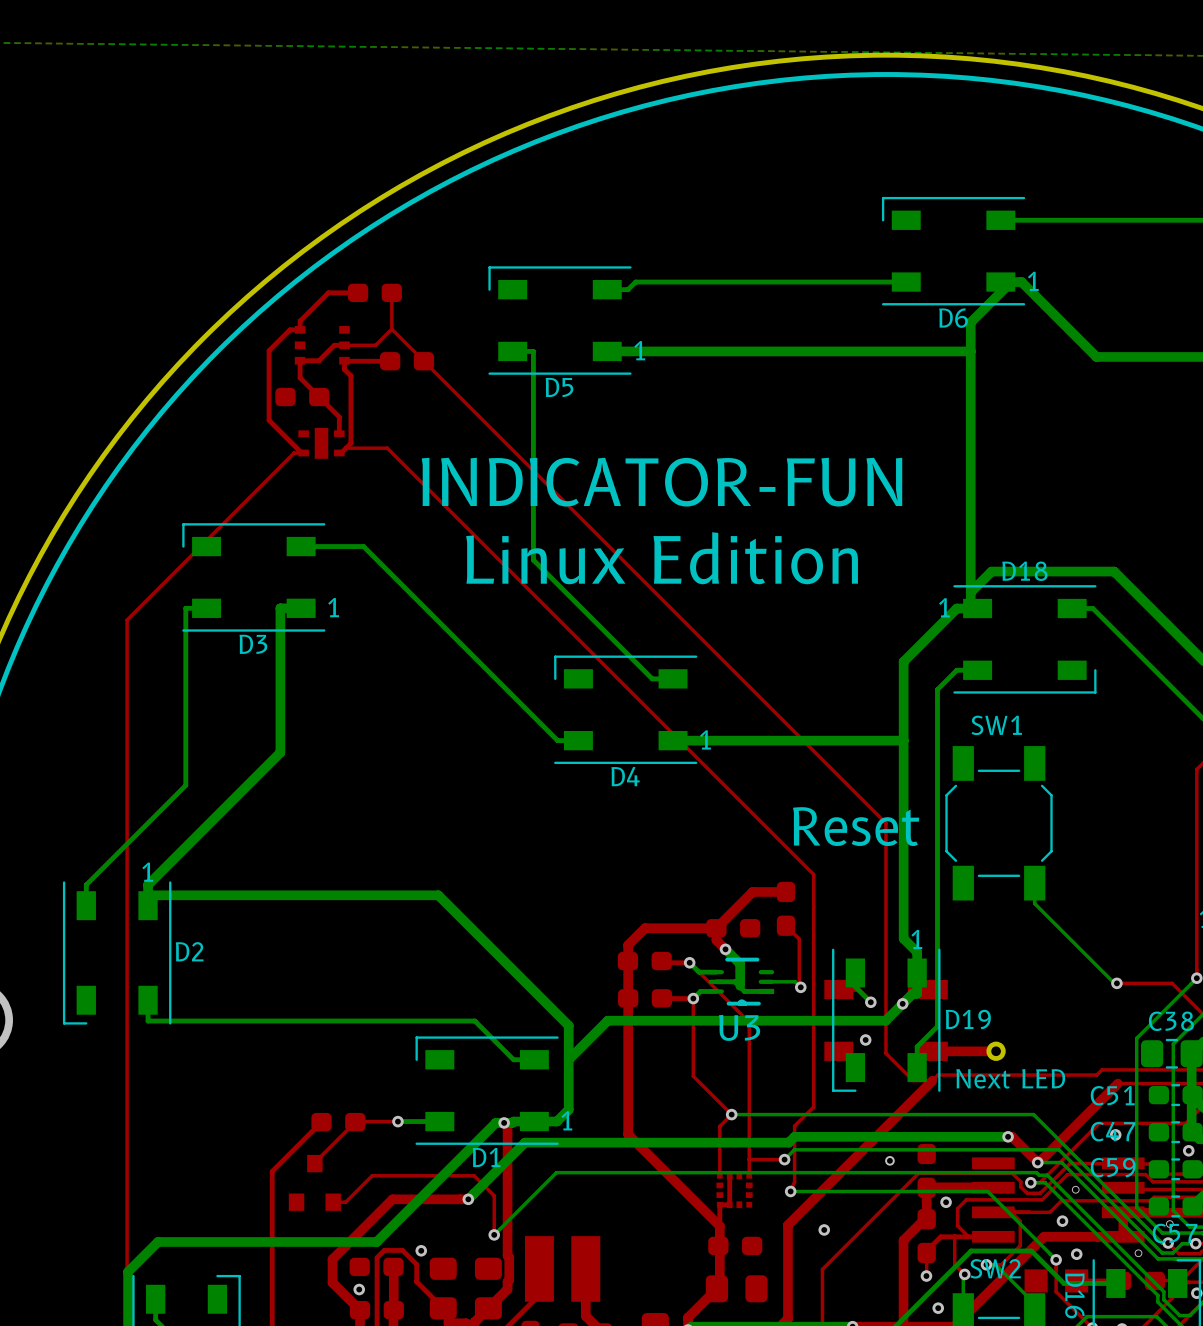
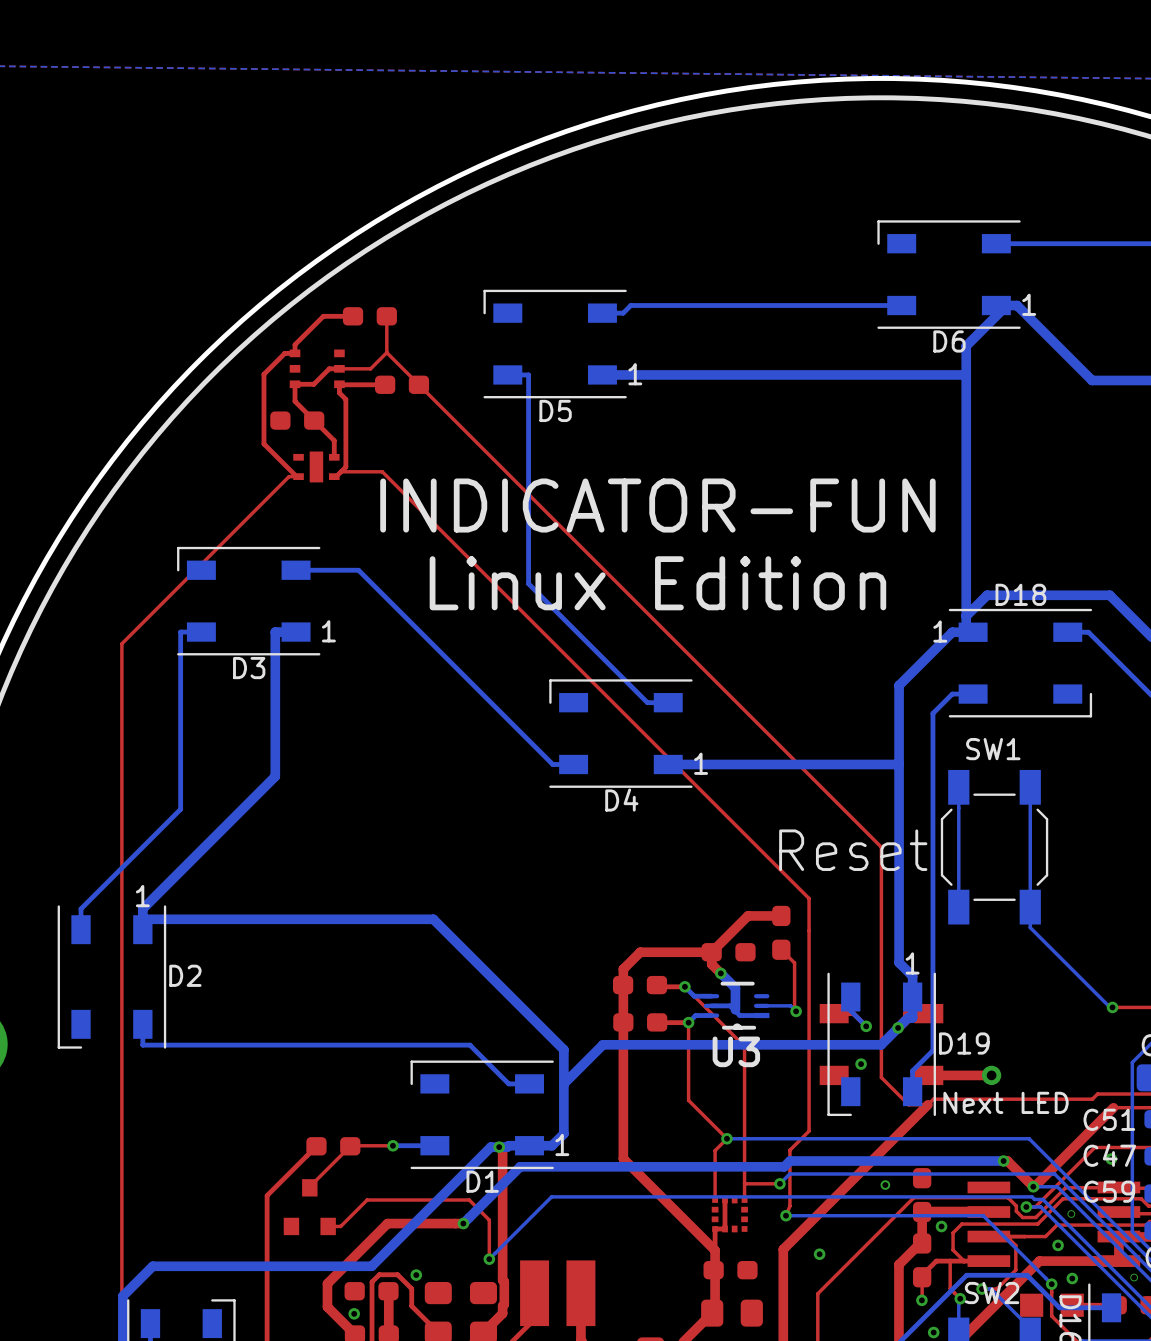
bottom track: none -> (958, 787) (958, 907)
bottom track: none -> (1030, 787) (1030, 907)

